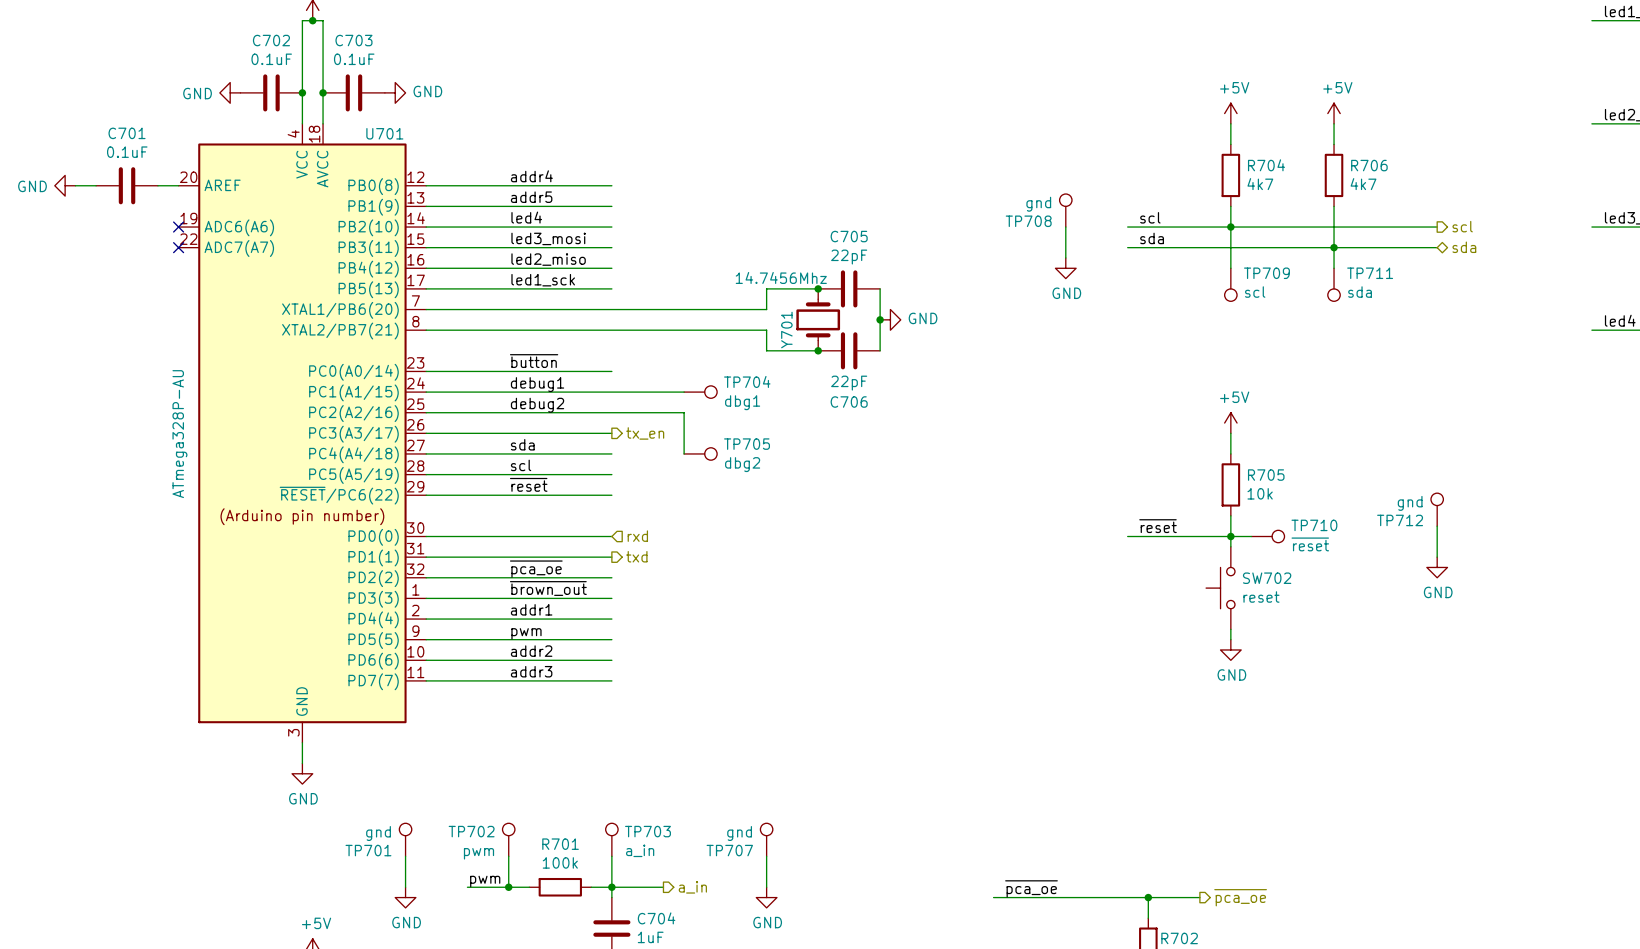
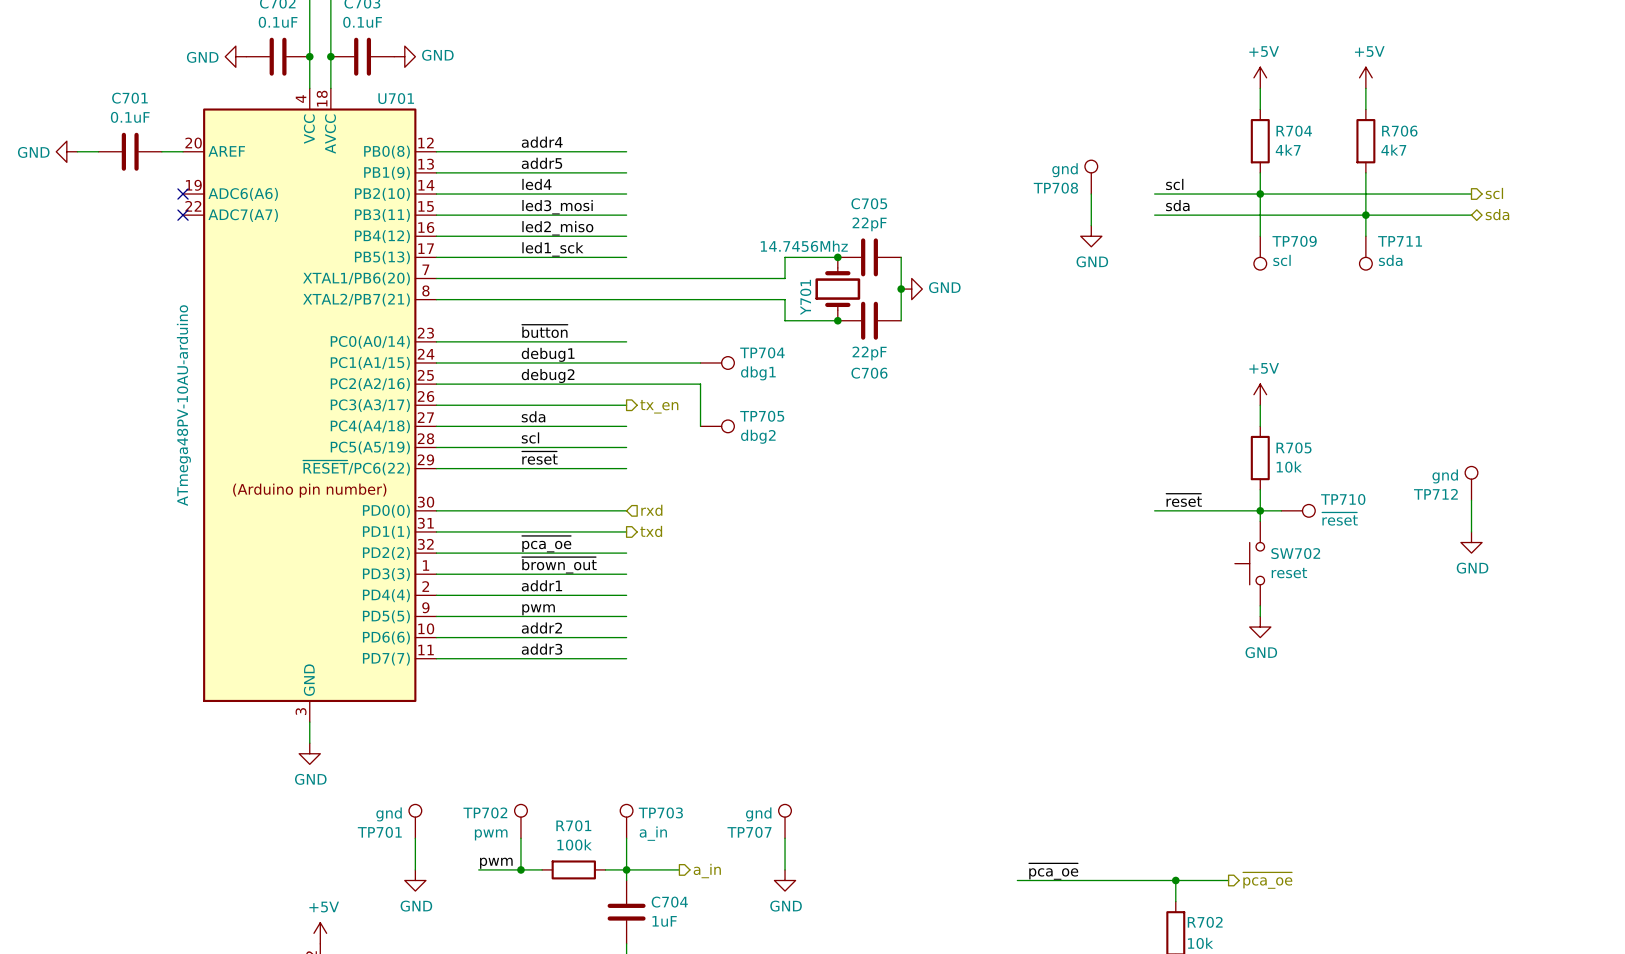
U701 value: ATmega328P-AU (179, 434) -> ATmega48PV-10AU-arduino (183, 405)

